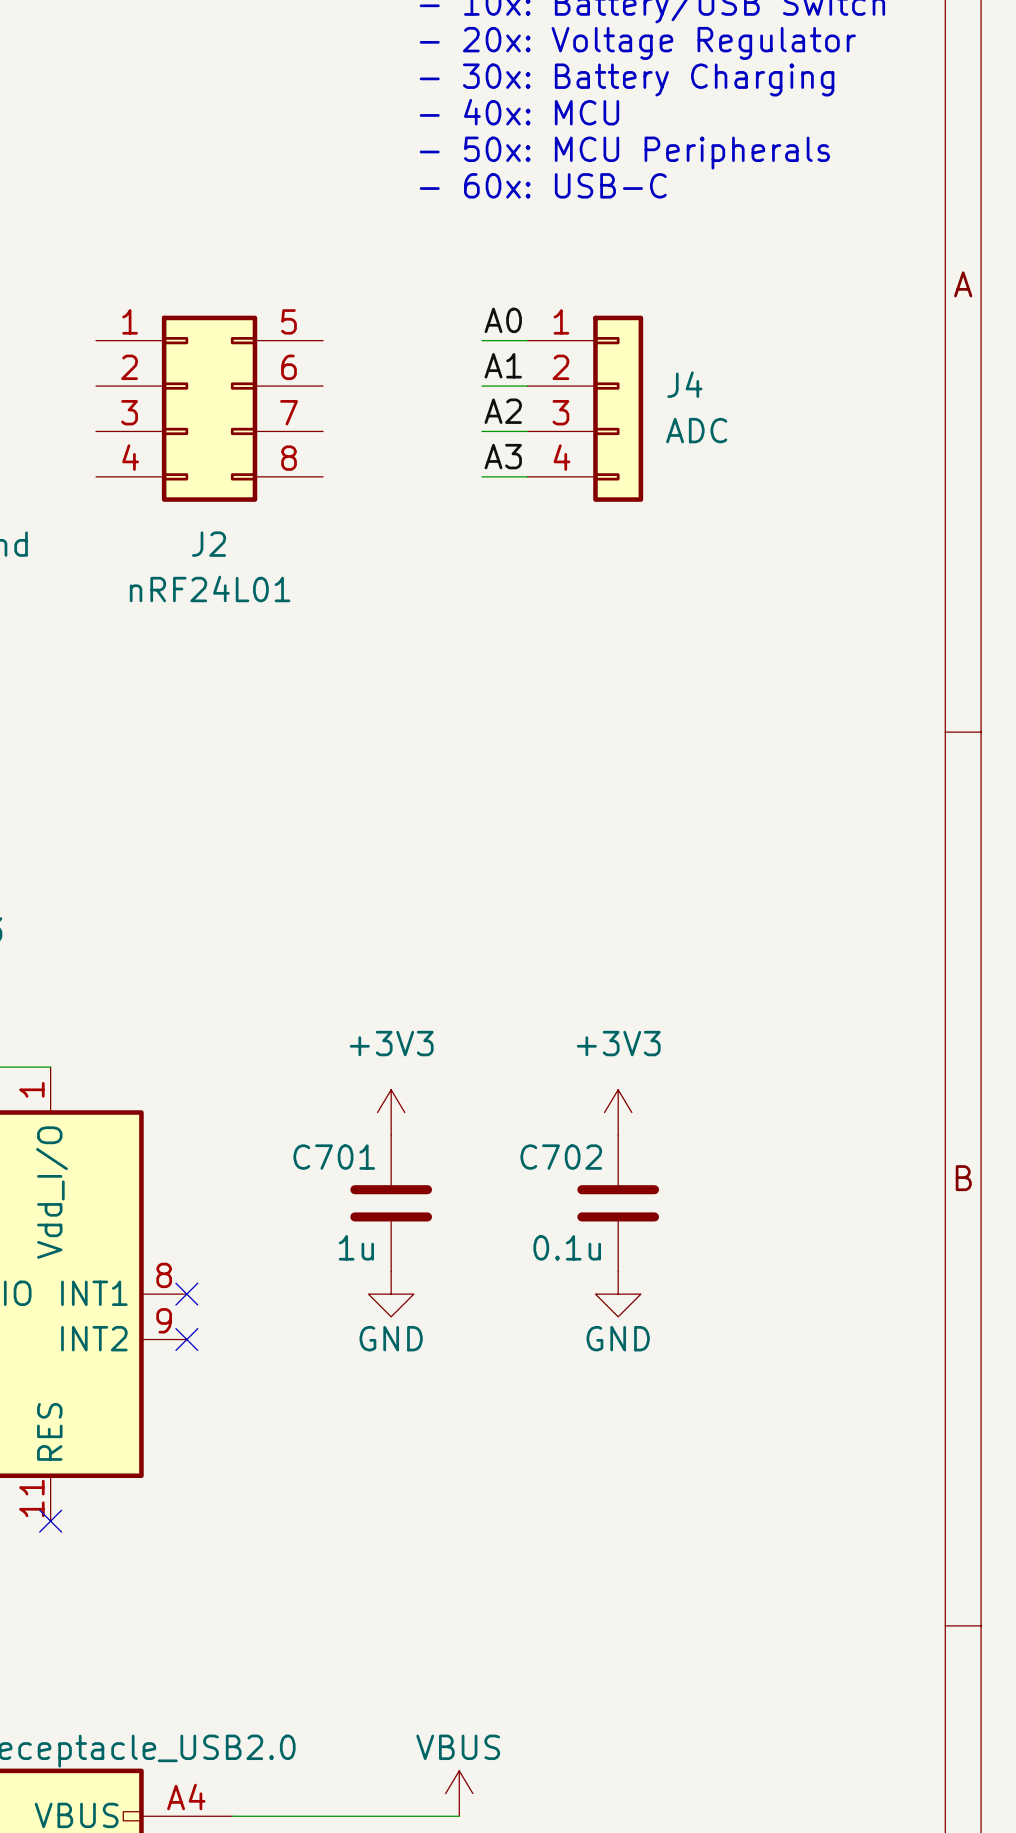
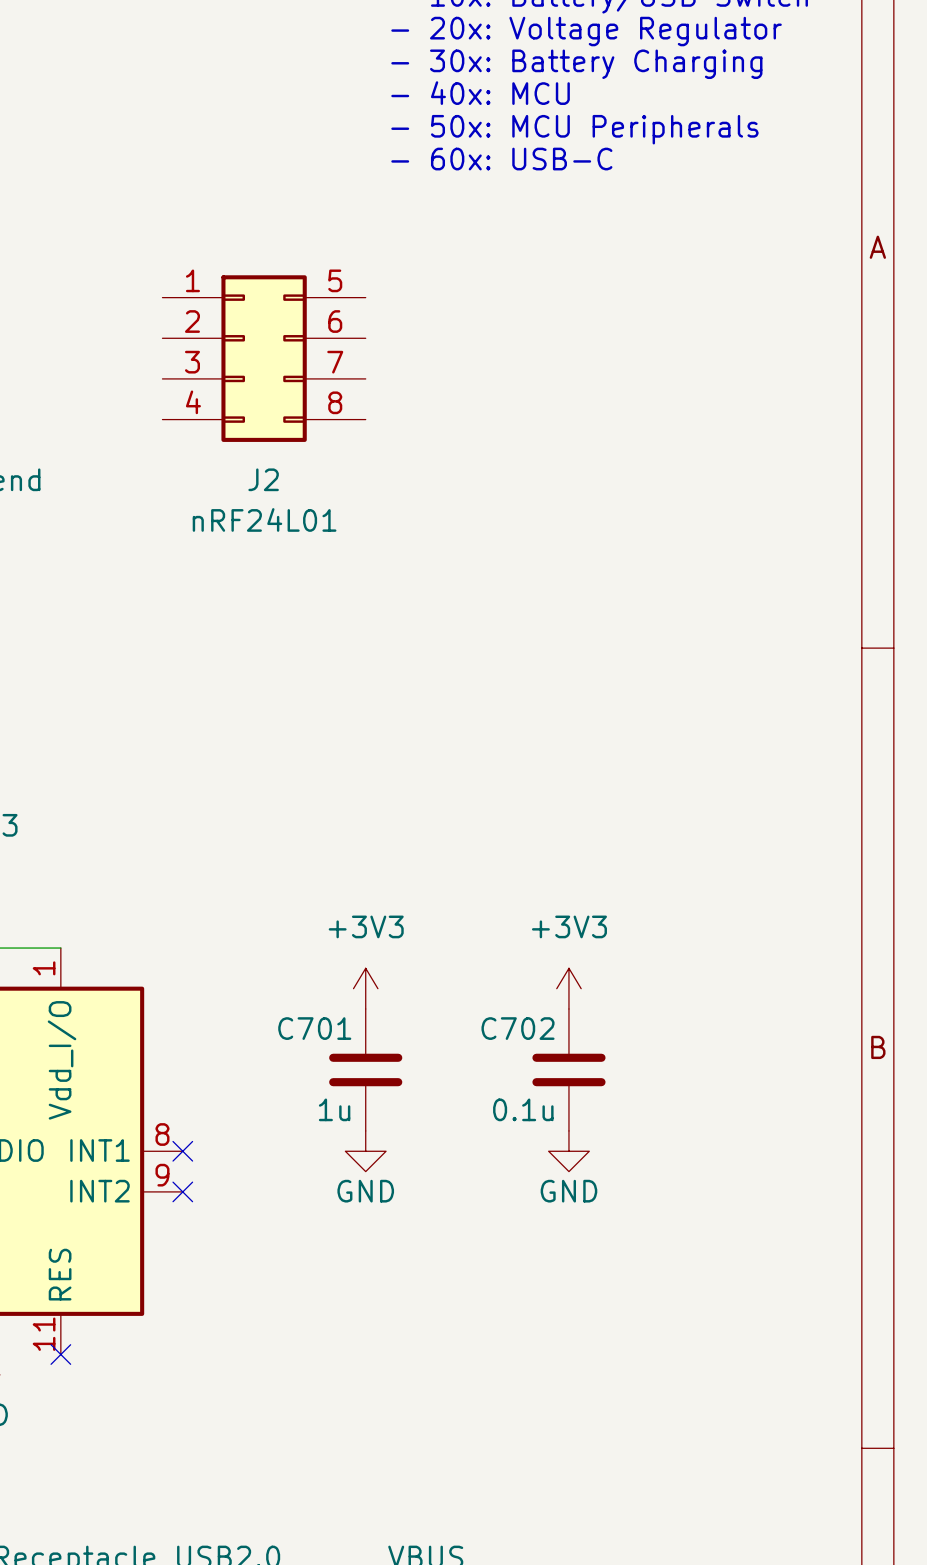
label: A0 (503, 320) -> none
wire: (481, 340) (527, 340) -> none
label: A1 (503, 365) -> none
wire: (481, 386) (527, 386) -> none
J2 position: (209, 408) -> (264, 358)
J4: ADC (585, 408) -> none
label: A2 (503, 411) -> none
wire: (481, 431) (527, 431) -> none
label: A3 (503, 456) -> none
wire: (481, 476) (527, 476) -> none

